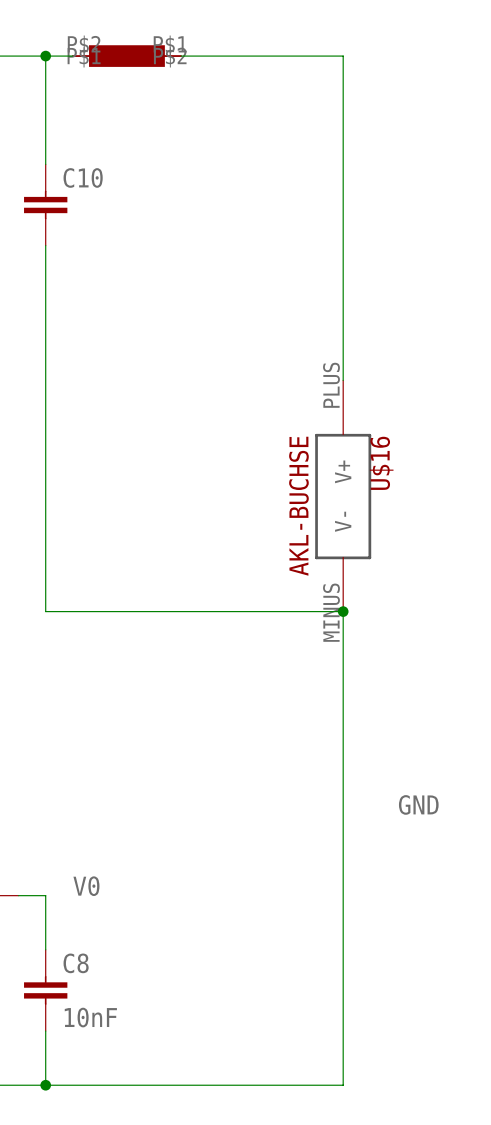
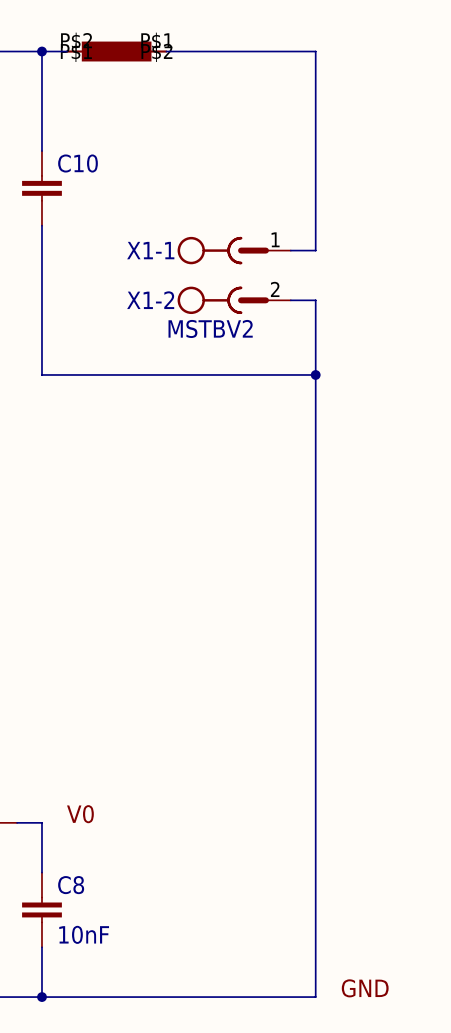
wire: (343, 56) (343, 380) -> (315, 51) (315, 250) (290, 250)
X1-1: none -> (234, 250)
X1-2: none -> MSTBV2 (234, 300)
wire: (45, 408) (45, 611) (343, 611) (343, 1085) -> (290, 300) (315, 300) (315, 997)
wire: none -> (41, 374) (315, 374)
junction: none -> (315, 374)
U$16: AKL-BUCHSE (343, 496) -> none
junction: (343, 611) -> none
label: GND (418, 804) -> none
label: none -> GND (365, 988)

